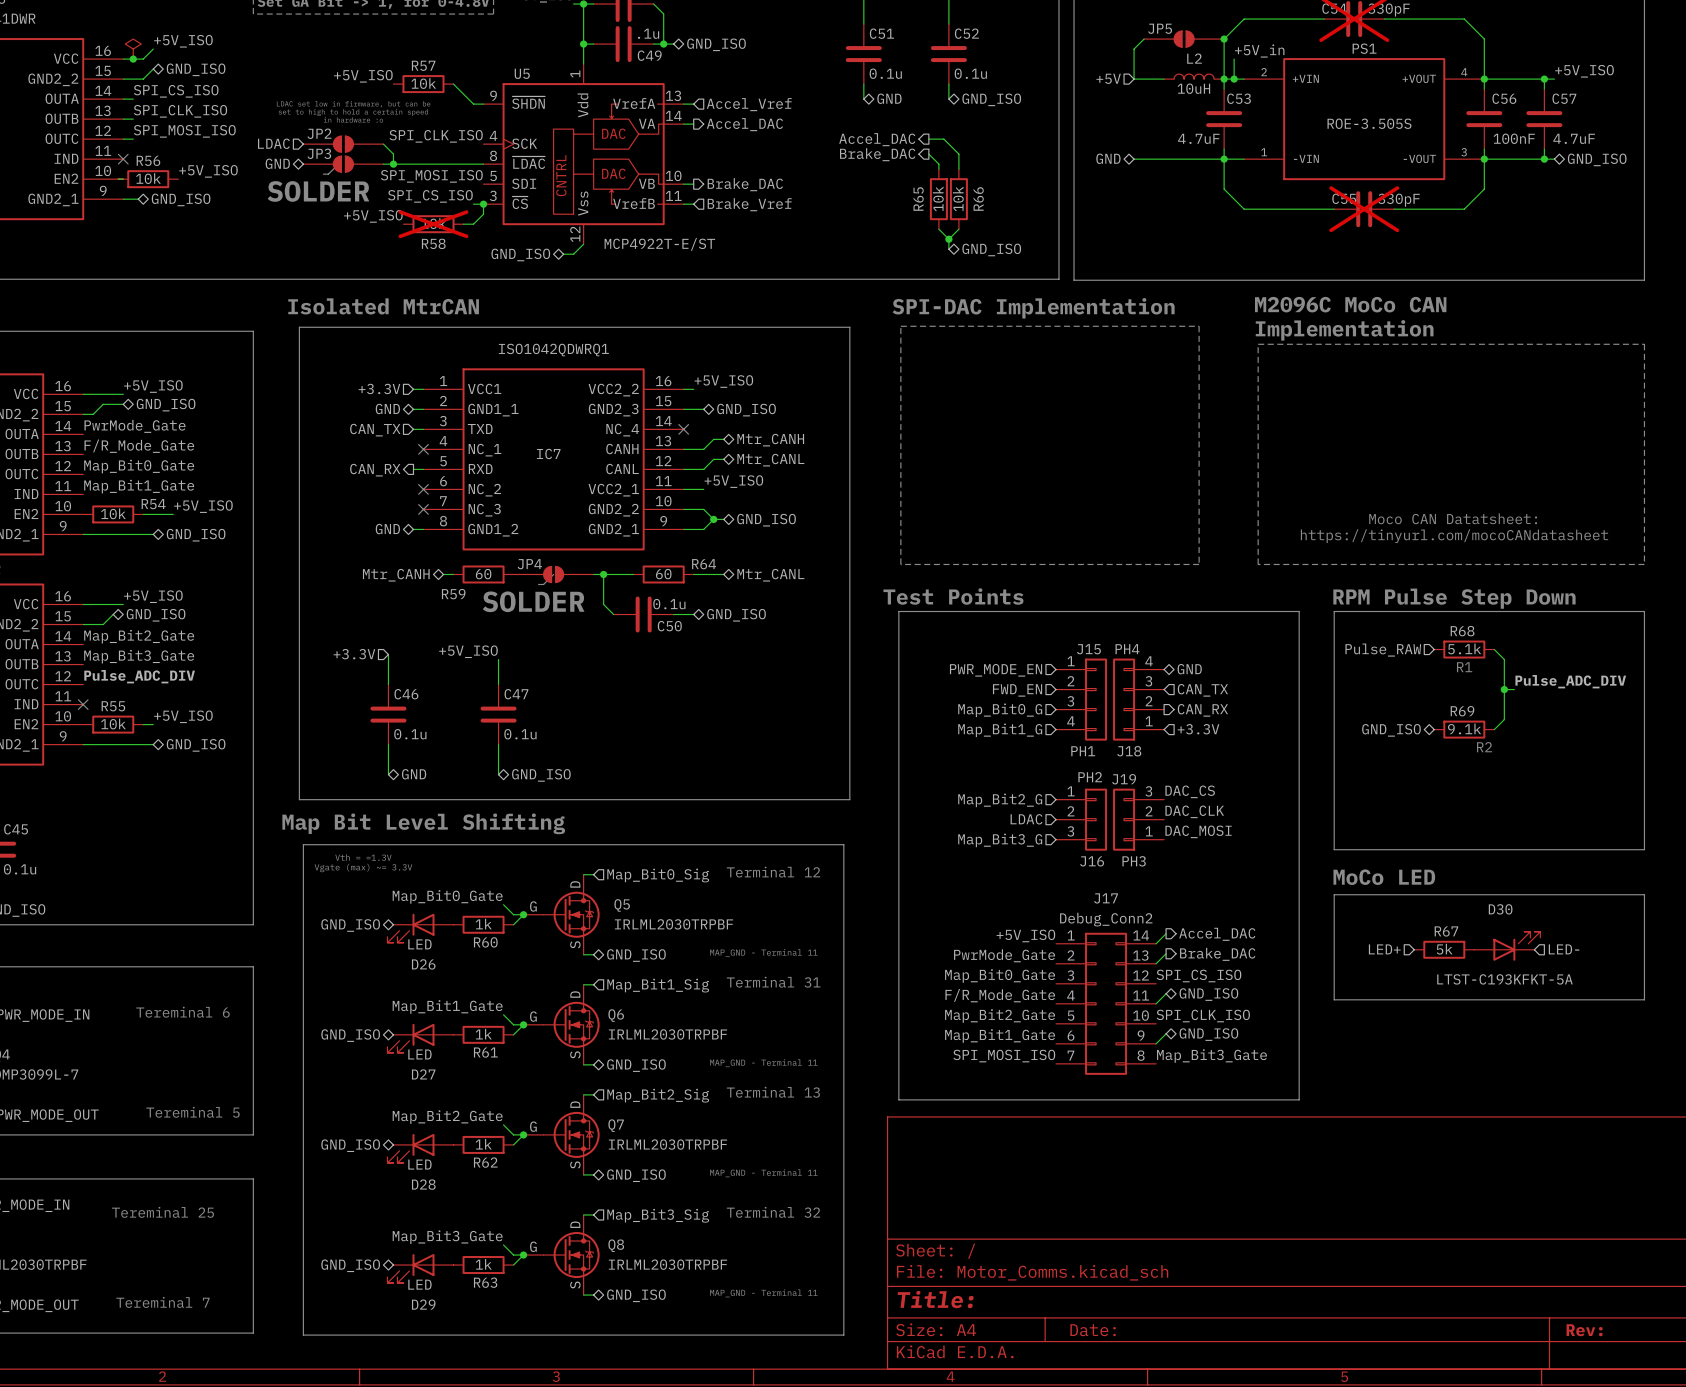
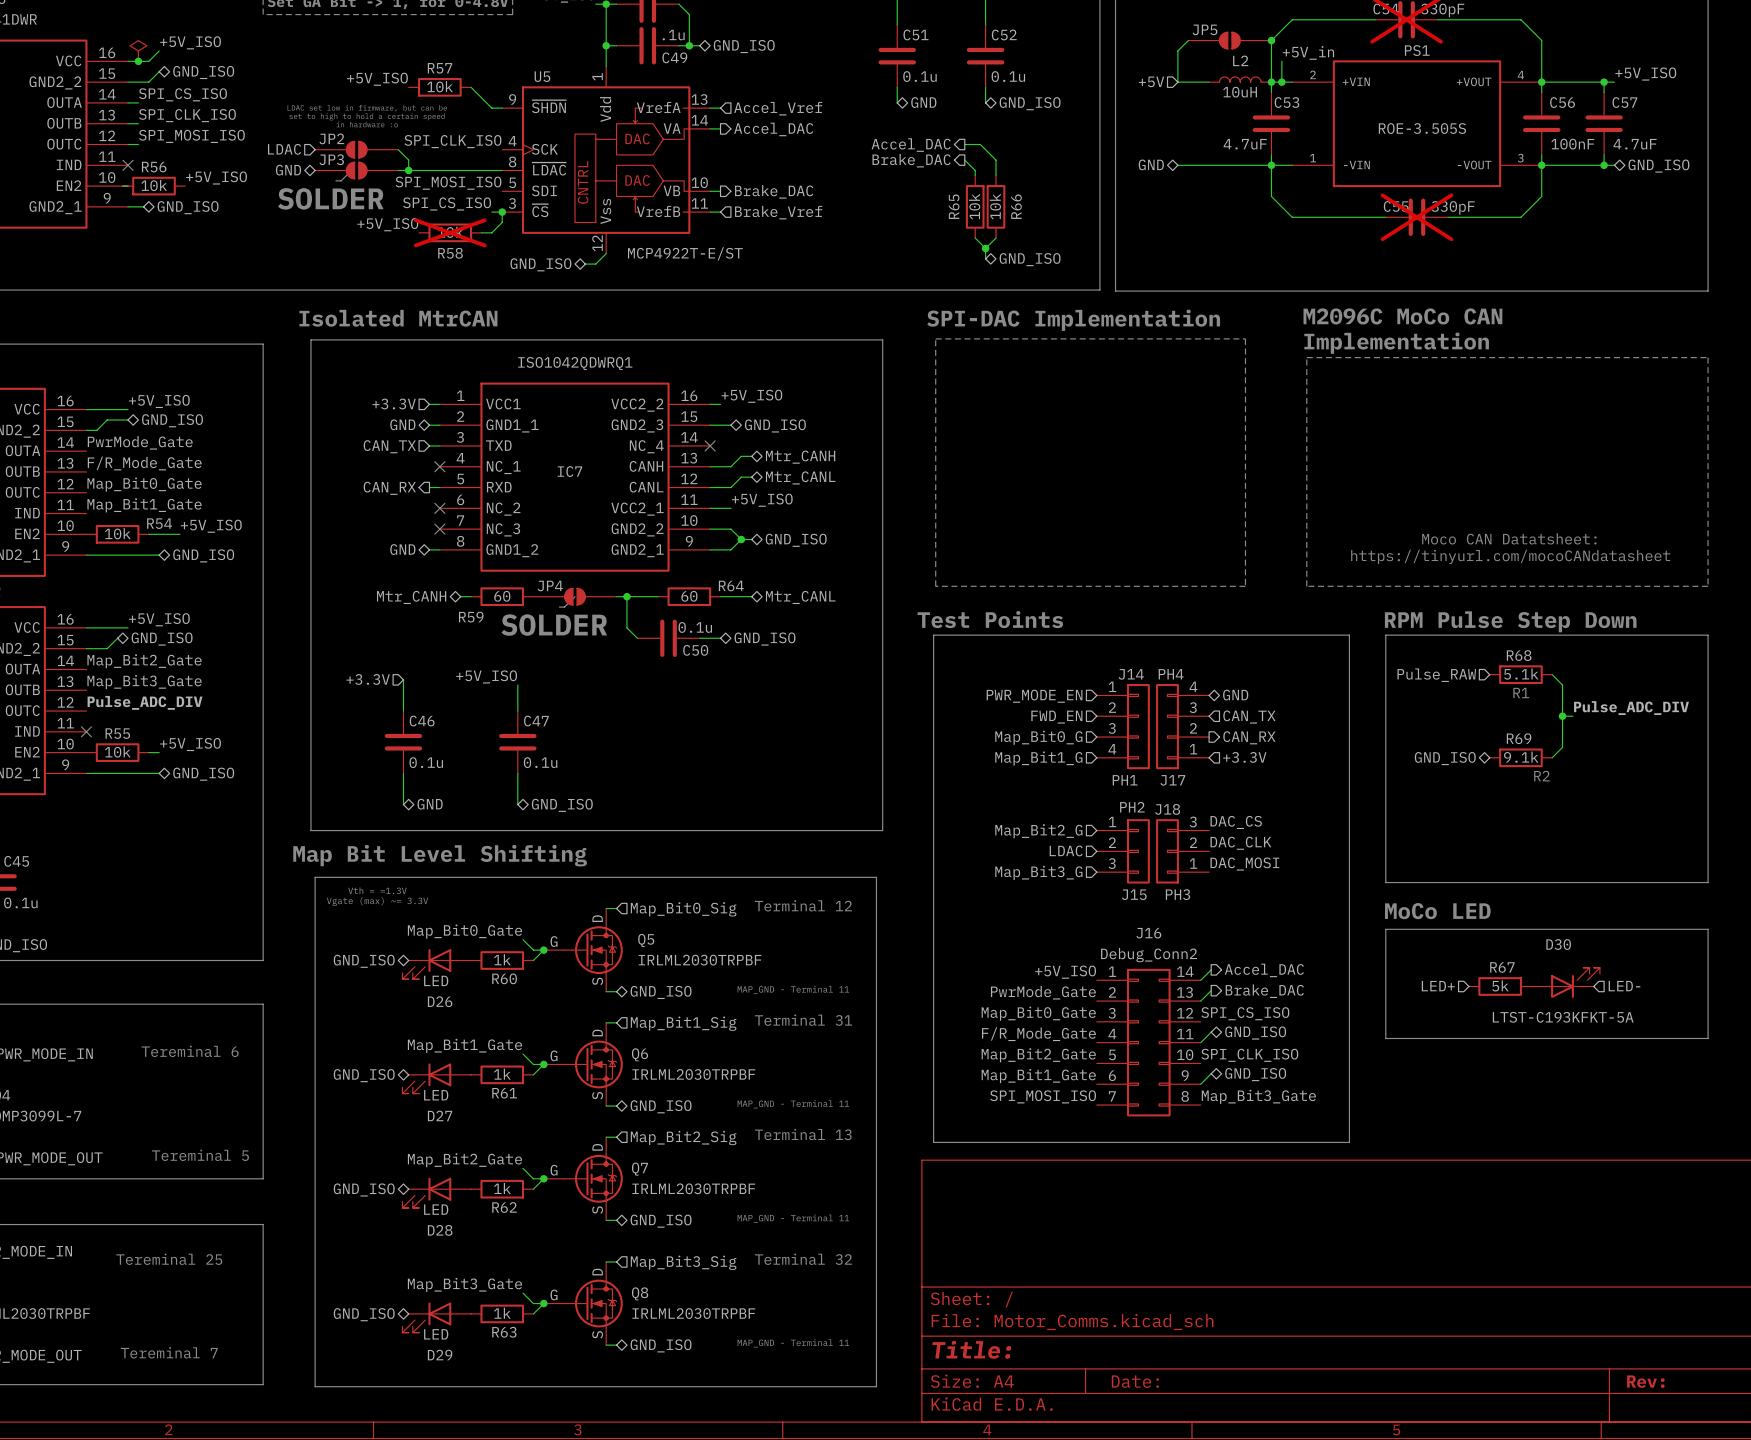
J15 name: J15 (1088, 649) -> J14 (1131, 674)
J18 name: J18 (1129, 751) -> J17 (1172, 780)
J19 name: J19 (1124, 779) -> J18 (1167, 809)
J16 name: J16 (1092, 861) -> J15 (1134, 894)
J17 name: J17 (1106, 898) -> J16 (1148, 933)

